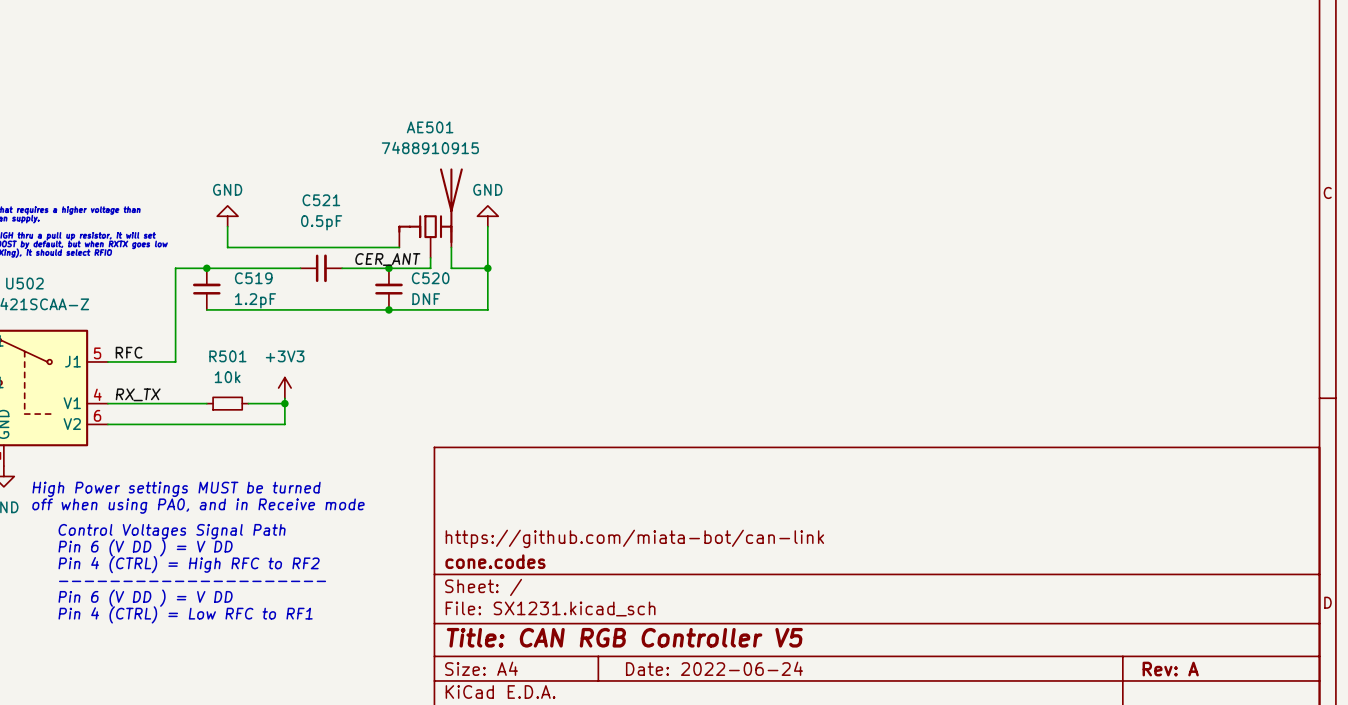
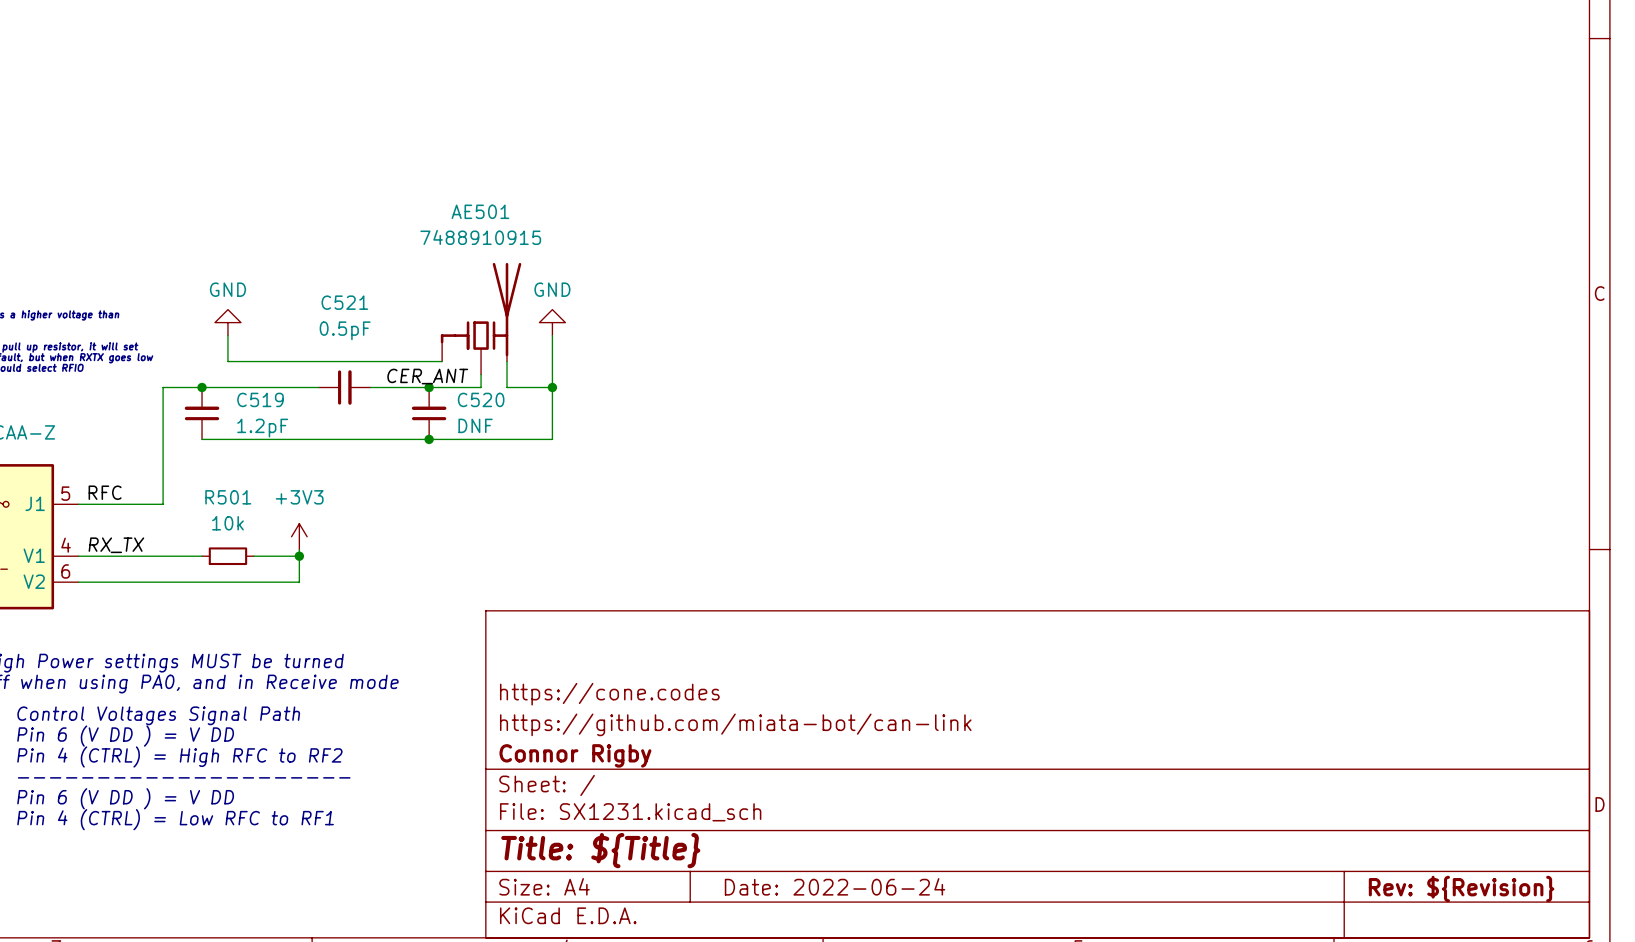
title block: none -> https://cone.codes (609, 694)
title block: cone.codes (495, 561) -> Connor Rigby (575, 755)
title block: Title: CAN RGB Controller V5 (624, 637) -> Title: ${Title} (600, 850)
title block: Rev: A (1170, 669) -> Rev: ${Revision} (1461, 889)

